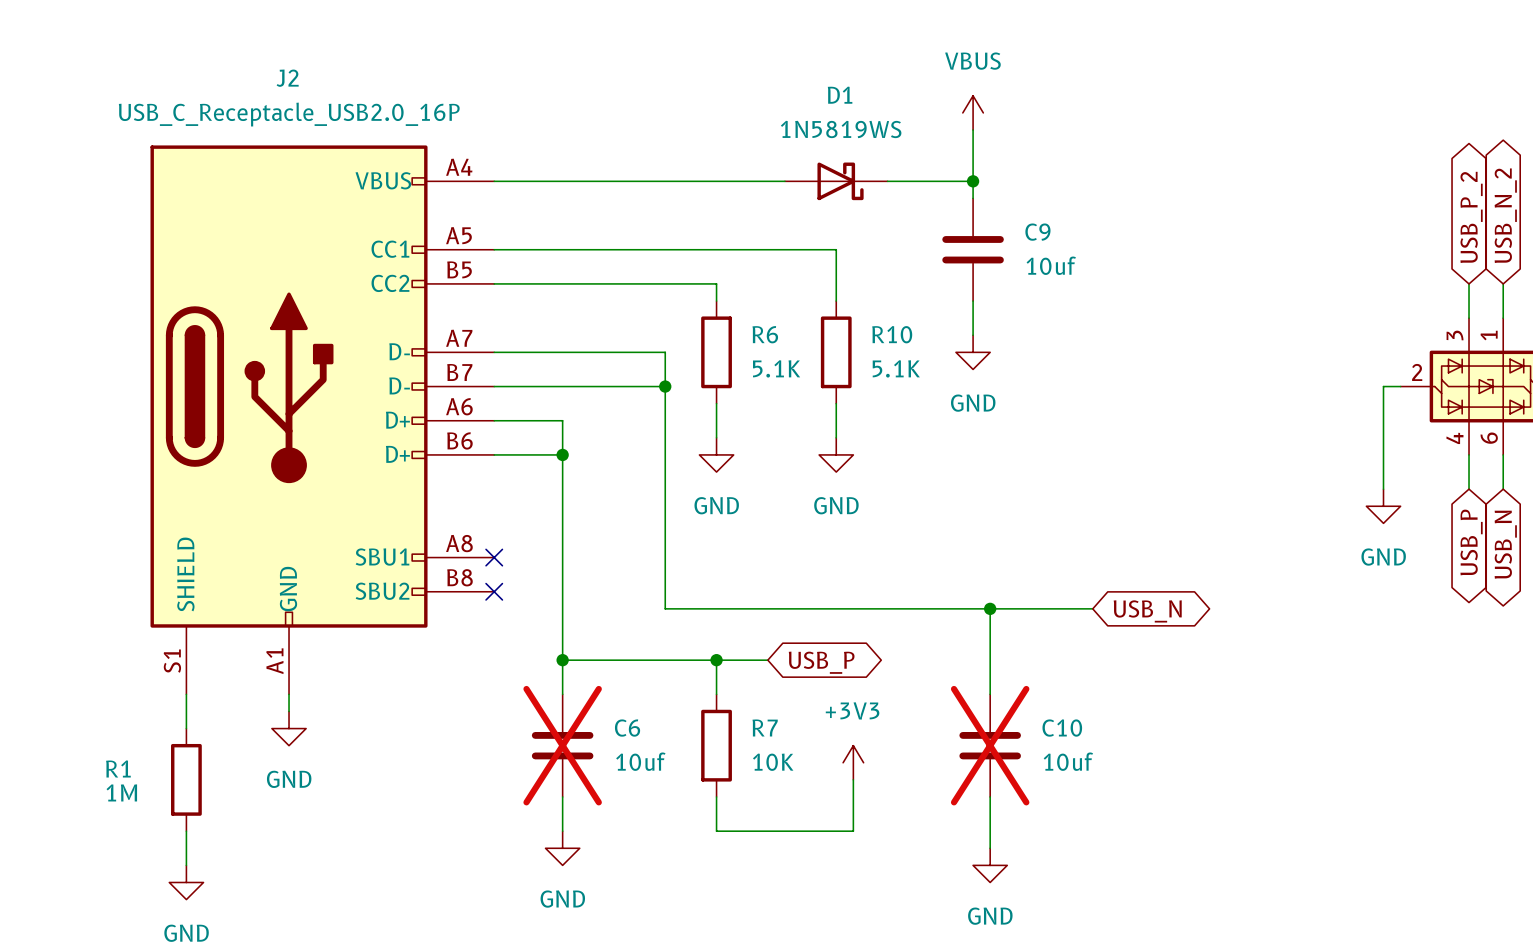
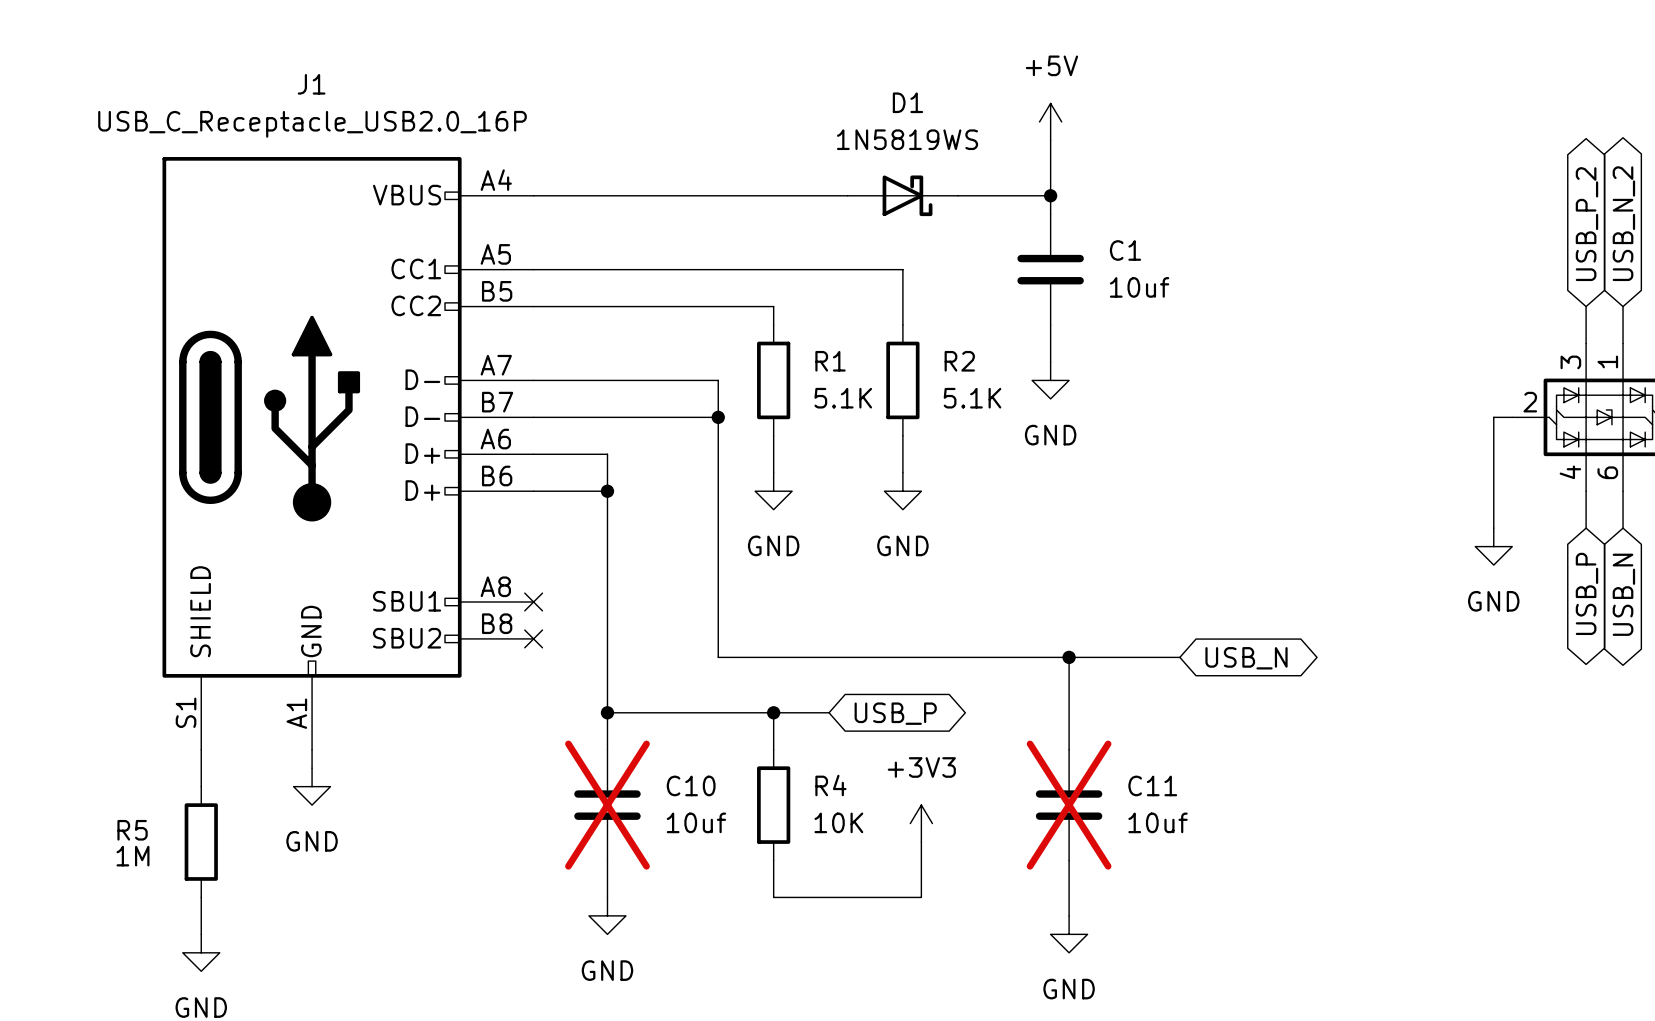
J2 name: J2 (287, 78) -> J1 (311, 84)
power symbol: VBUS (973, 112) -> +5V (1050, 121)
C9 name: C9 (1037, 232) -> C1 (1125, 250)
R6 name: R6 (765, 334) -> R1 (830, 361)
R10 name: R10 (892, 334) -> R2 (959, 361)
R7 name: R7 (765, 727) -> R4 (830, 785)
C6 name: C6 (627, 728) -> C10 (691, 785)
C10 name: C10 (1062, 728) -> C11 (1152, 785)
R1 name: R1 (118, 768) -> R5 (132, 830)

